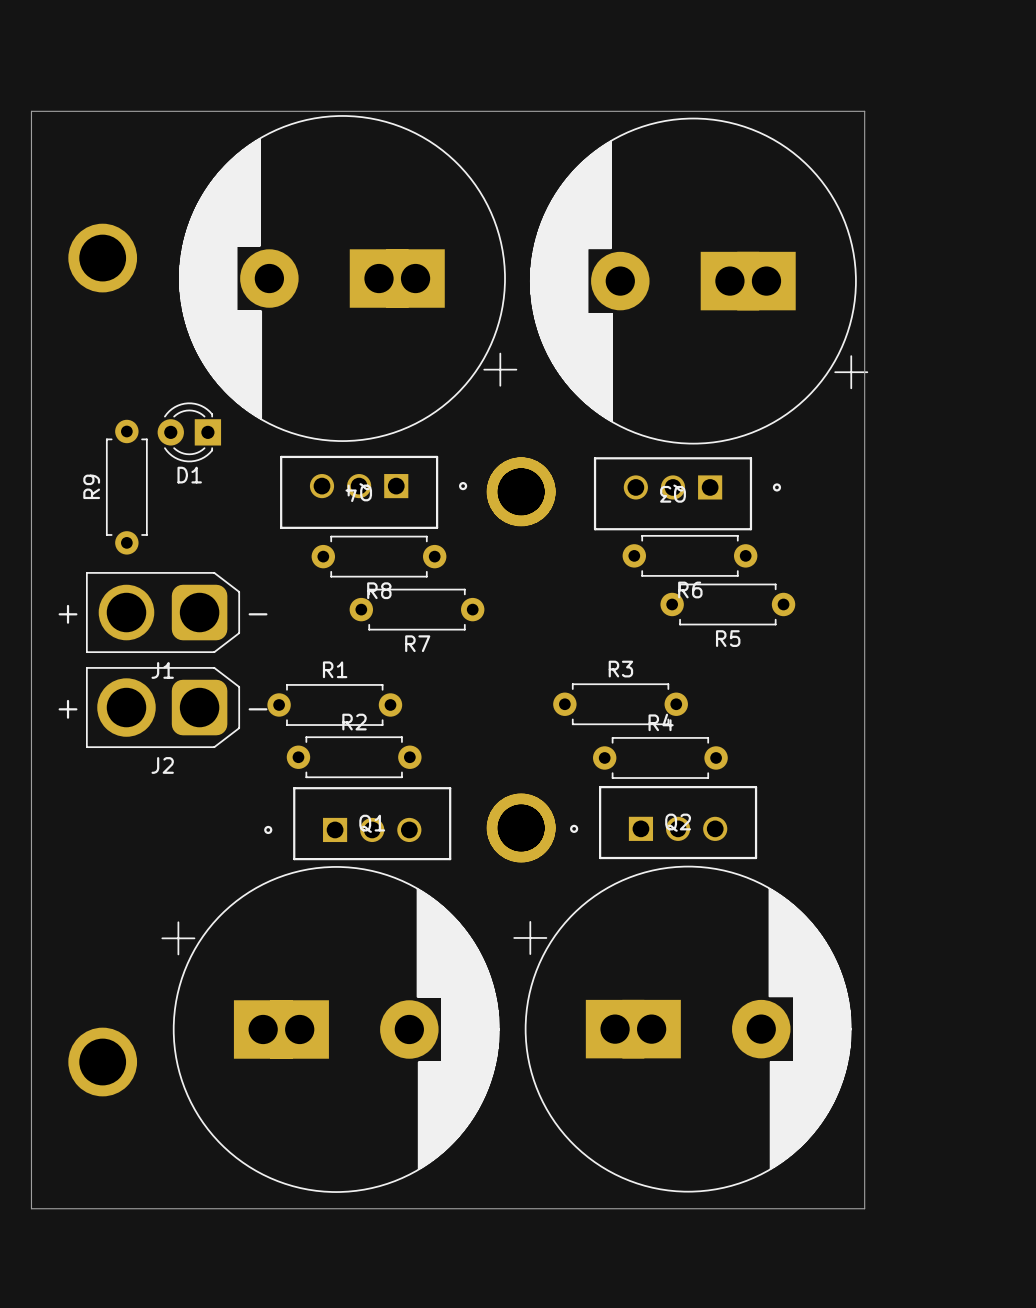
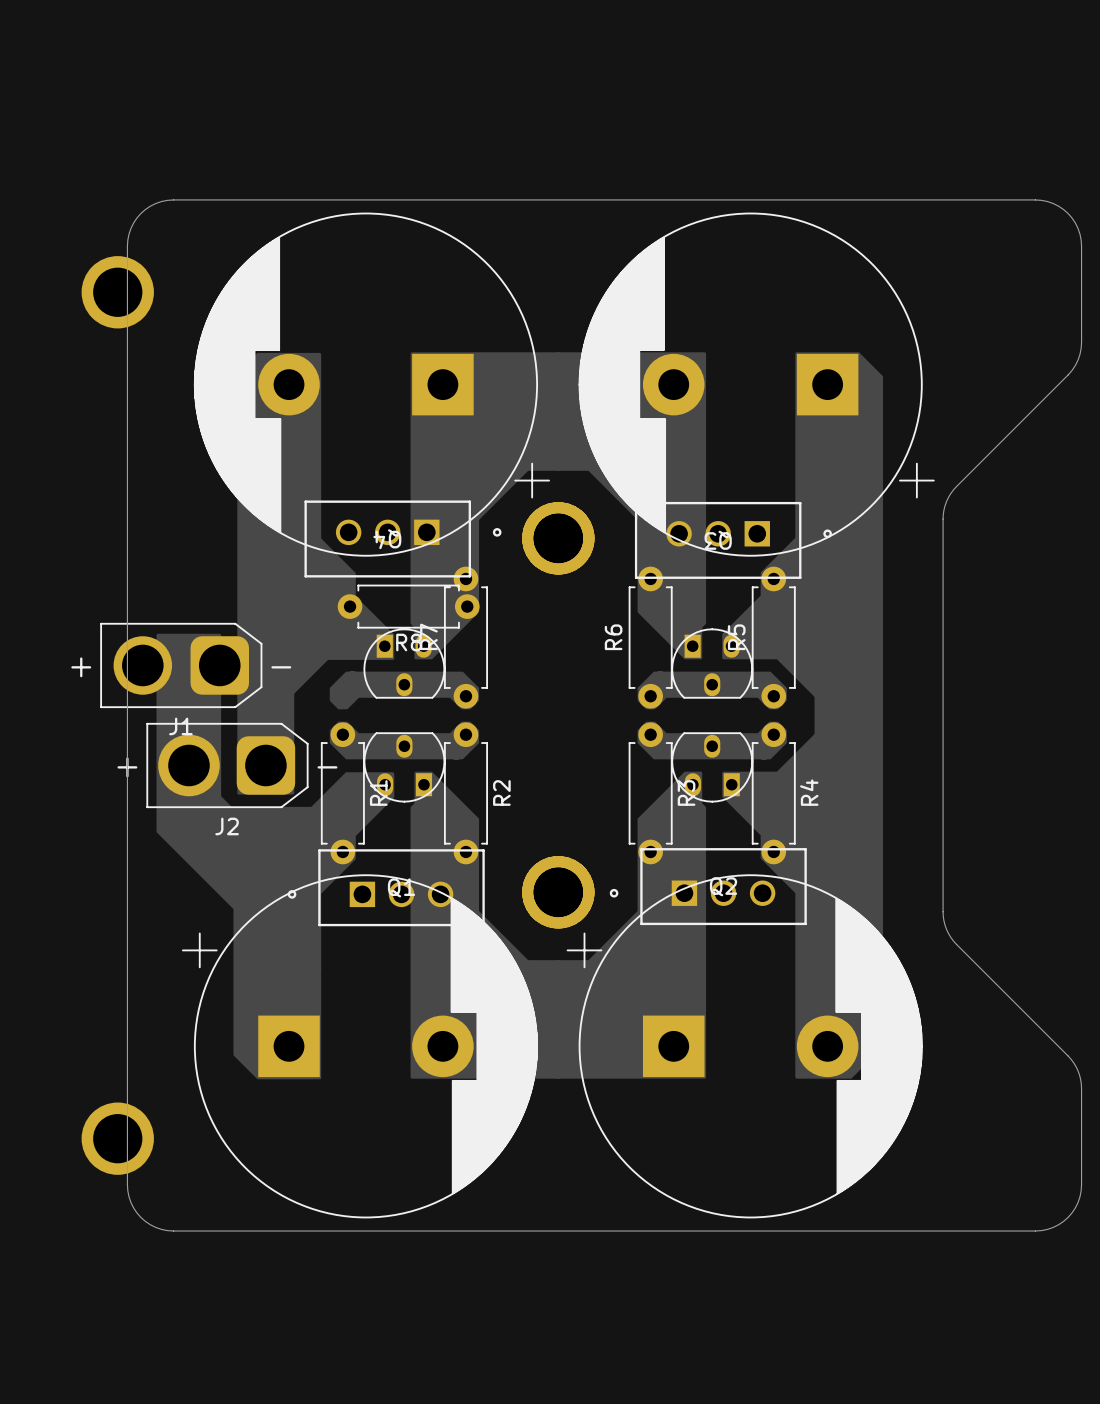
board edge: (31, 111) (864, 111) (864, 1208) (31, 1208) (31, 111) -> (173, 199) (155, 203) (140, 213) (130, 228) (127, 246) (127, 1184) (130, 1202) (136, 1212) (150, 1224) (161, 1229) (173, 1231) (1035, 1231) (1053, 1227) (1063, 1221) (1075, 1207) (1081, 1190) (1081, 1088) (1078, 1070) (1068, 1055) (953, 941) (943, 920) (943, 519) (945, 505) (953, 489) (1068, 375) (1078, 360) (1081, 342) (1081, 246) (1078, 228) (1072, 218) (1063, 209) (1053, 203) (1035, 199) (173, 199)
part: (348, 278) -> none
part: (699, 281) -> none
drawing: none -> [156, 352, 884, 1080]
part: none -> (371, 384)
part: none -> (756, 384)
D1: (189, 432) -> none
R9: (126, 487) -> none
R6 rotation: 0° (689, 555) -> 90° clockwise (650, 637)
R6 position: (689, 555) -> (650, 637)
R5 rotation: 0° (727, 604) -> 90° clockwise (773, 637)
R7 rotation: 0° (417, 609) -> 90° clockwise (465, 637)
part: none -> (404, 663)
part: none -> (712, 663)
R1 rotation: 0° (334, 704) -> 90° clockwise (342, 793)
R3 rotation: 0° (620, 704) -> 90° clockwise (650, 793)
J2 position: (163, 707) -> (227, 765)
part: none -> (404, 767)
part: none -> (712, 767)
R2 rotation: 0° (354, 757) -> 90° clockwise (465, 793)
R2 position: (354, 757) -> (465, 793)
R4 rotation: 0° (660, 757) -> 90° clockwise (773, 793)
part: none -> (359, 1046)
part: none -> (744, 1046)
part: (330, 1029) -> none
part: (682, 1029) -> none

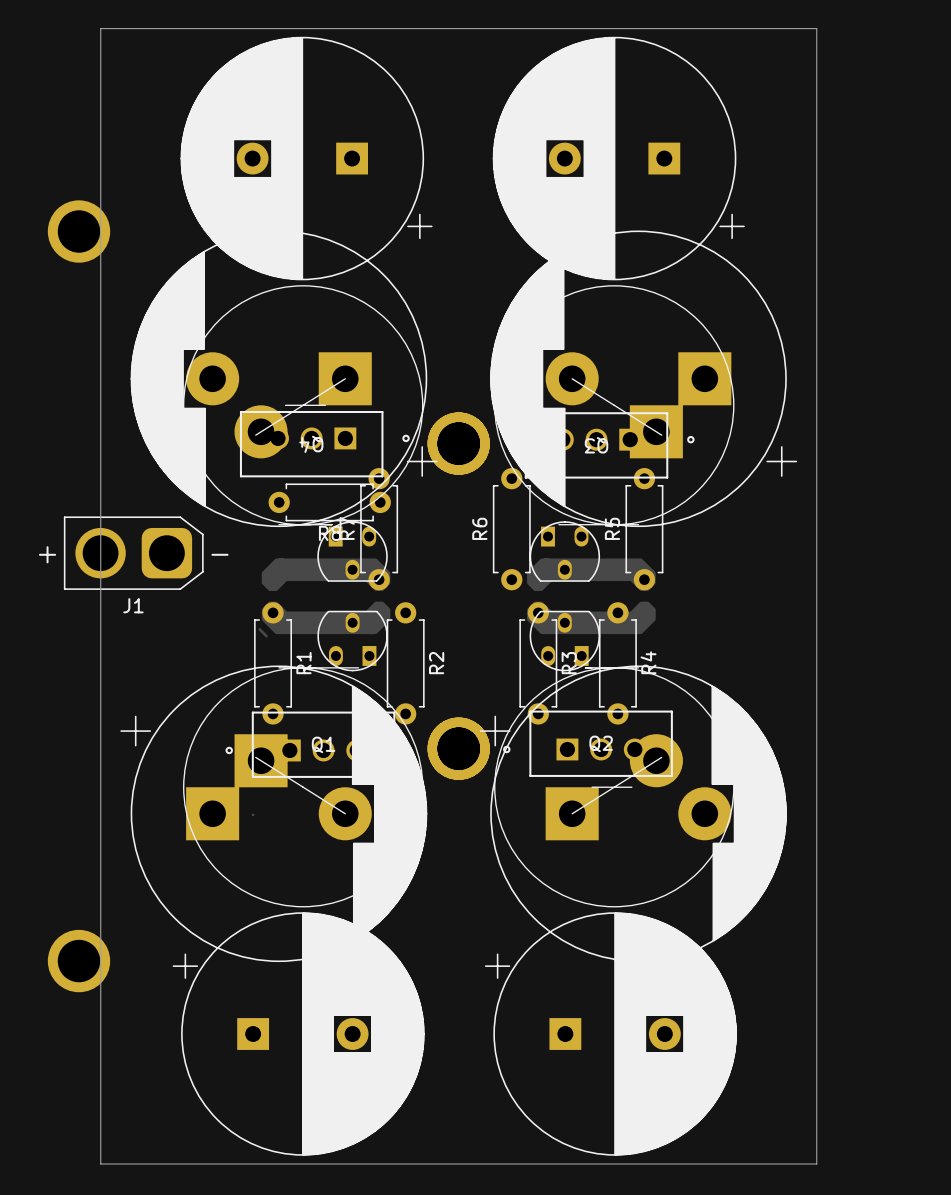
board edge: (173, 199) (1035, 199) (1053, 203) (1063, 209) (1072, 218) (1078, 228) (1081, 246) (1081, 342) (1078, 360) (1068, 375) (953, 489) (945, 505) (943, 519) (943, 920) (953, 941) (1068, 1055) (1078, 1070) (1081, 1088) (1081, 1190) (1075, 1207) (1063, 1221) (1053, 1227) (1035, 1231) (173, 1231) (161, 1229) (150, 1224) (136, 1212) (130, 1202) (127, 1184) (127, 246) (130, 228) (140, 213) (155, 203) (173, 199) -> (100, 28) (100, 1164) (816, 1164) (816, 28) (100, 28)
part: none -> (306, 158)
part: none -> (618, 158)
drawing: [156, 352, 884, 1080] -> none
part: (371, 384) -> none
part: (756, 384) -> none
part: none -> (284, 378)
part: none -> (643, 378)
R6 position: (650, 637) -> (511, 529)
part position: (404, 663) -> (352, 551)
part position: (712, 663) -> (564, 551)
track: none -> (259, 629) (266, 636)
J2: (227, 765) -> none
part position: (404, 767) -> (352, 641)
part position: (712, 767) -> (564, 641)
R2 position: (465, 793) -> (405, 663)
R4 position: (773, 793) -> (617, 663)
part: none -> (273, 813)
part: none -> (633, 813)
part: (359, 1046) -> none
part: (744, 1046) -> none
part: none -> (298, 1034)
part: none -> (610, 1034)

